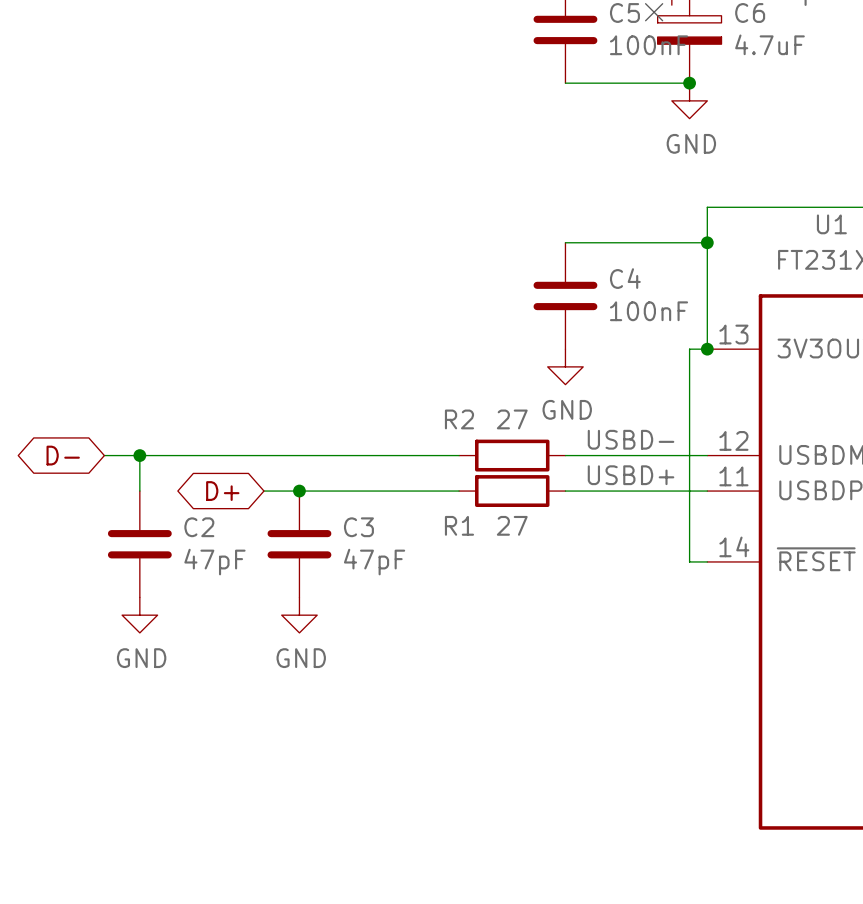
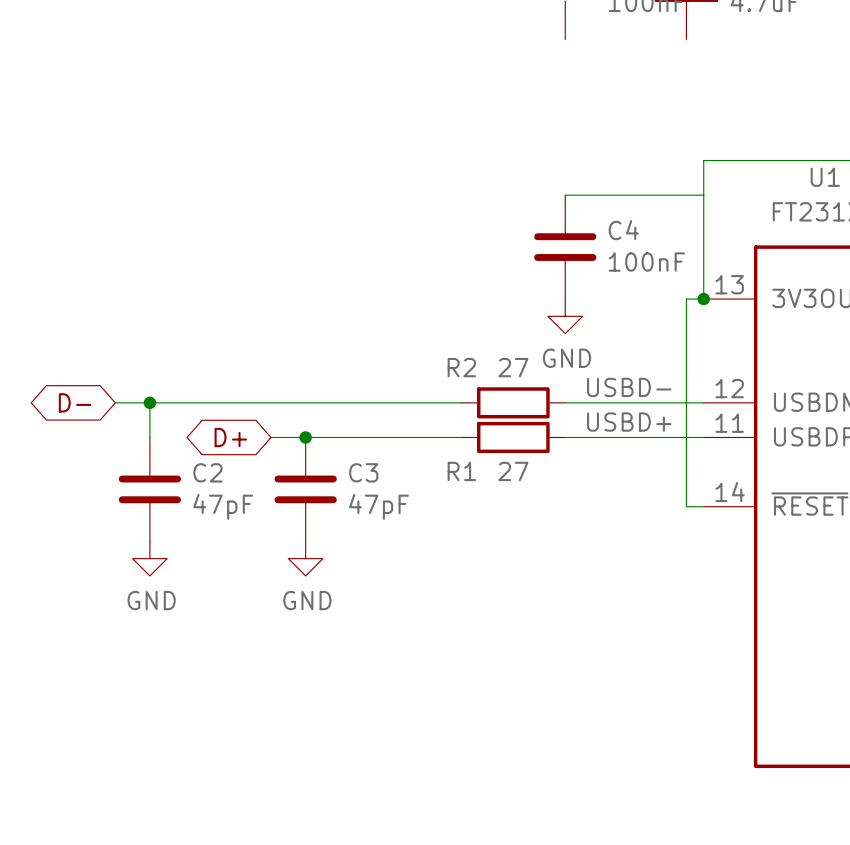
wire: (565, 83) (689, 83) -> none
junction: (689, 83) -> none
power symbol: GND (689, 100) -> none
junction: (707, 242) -> none

